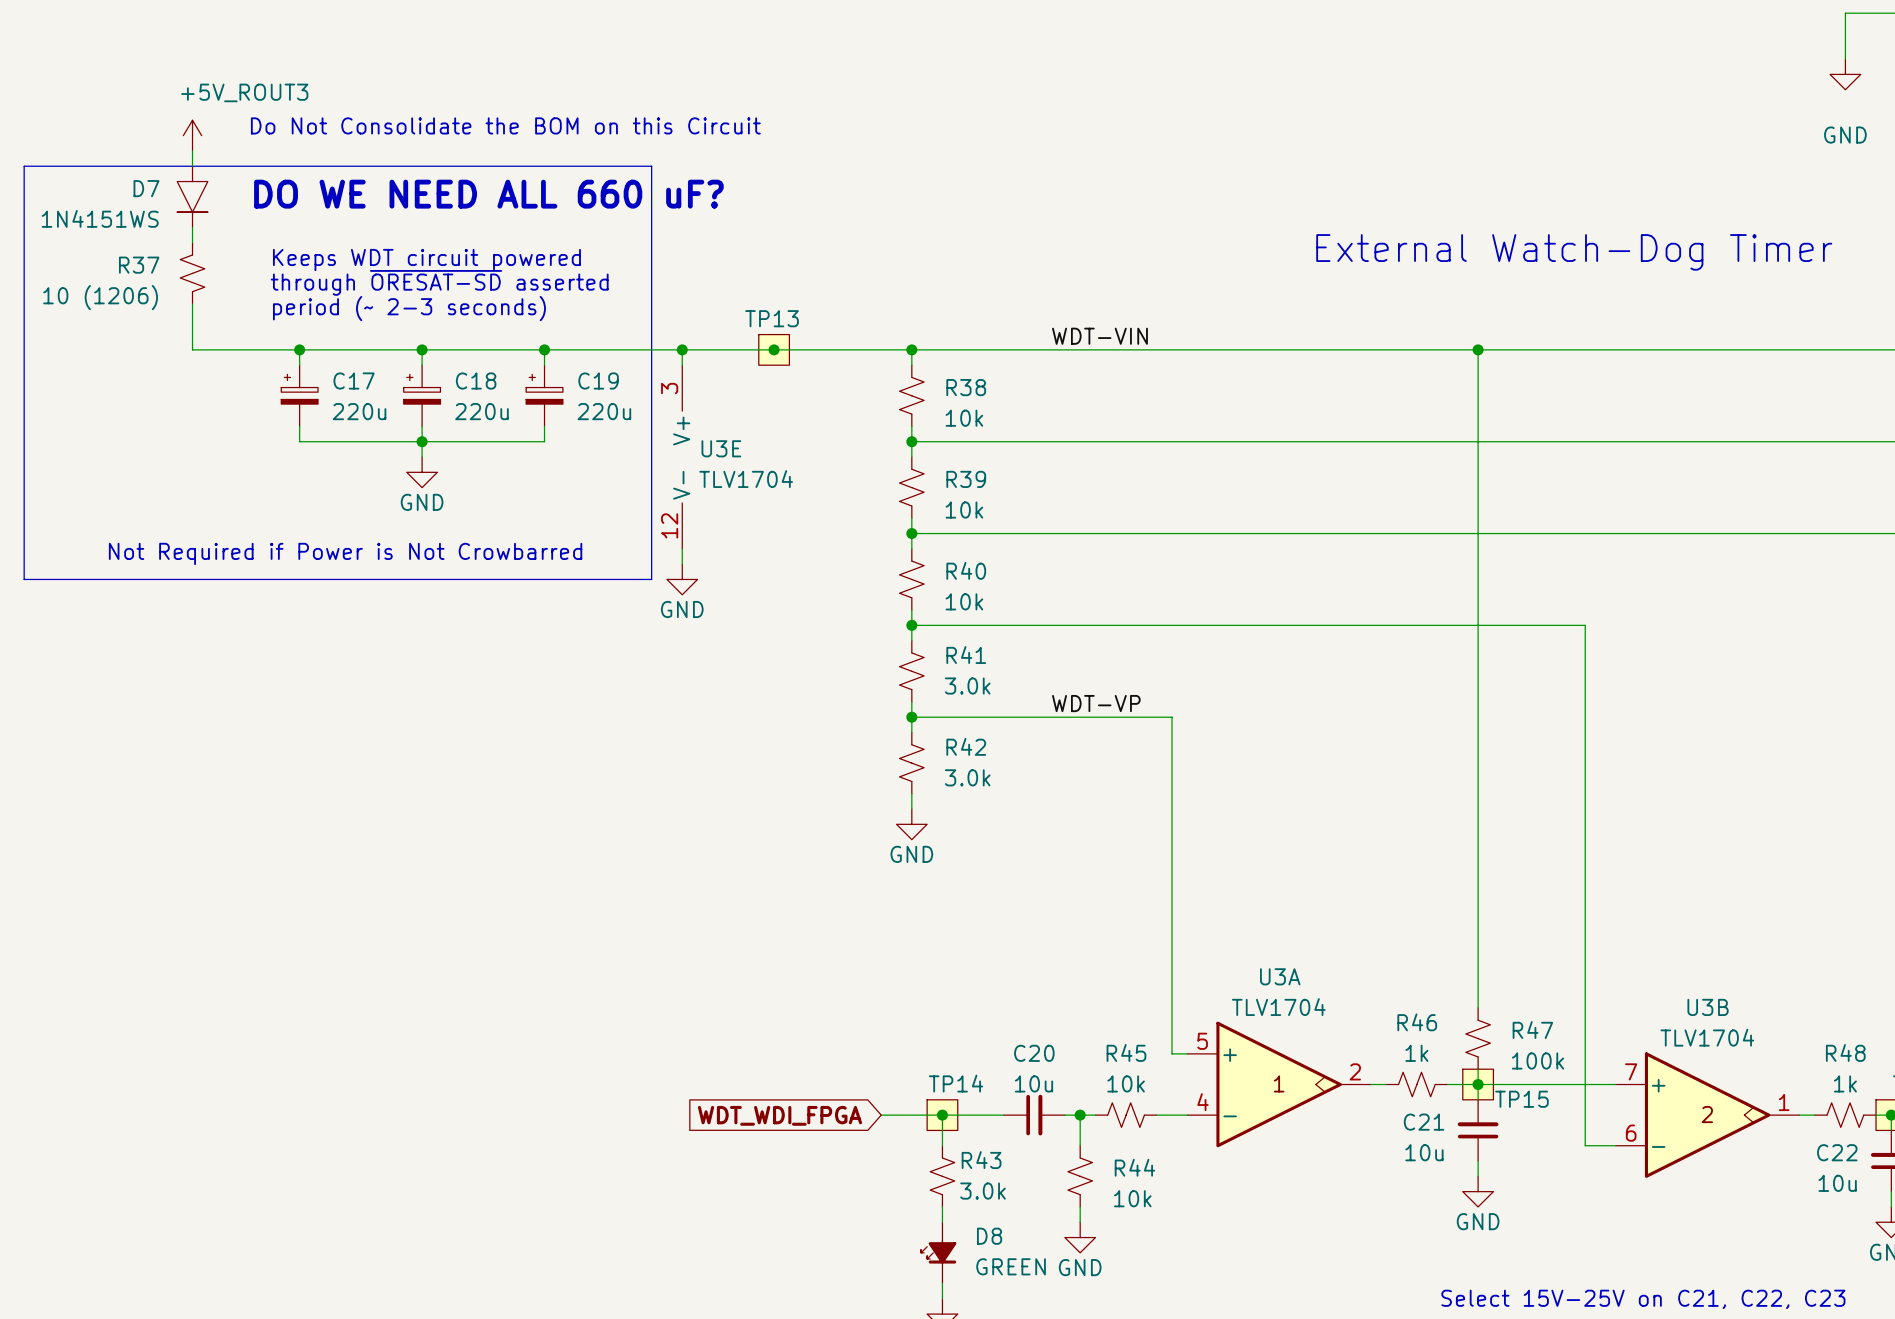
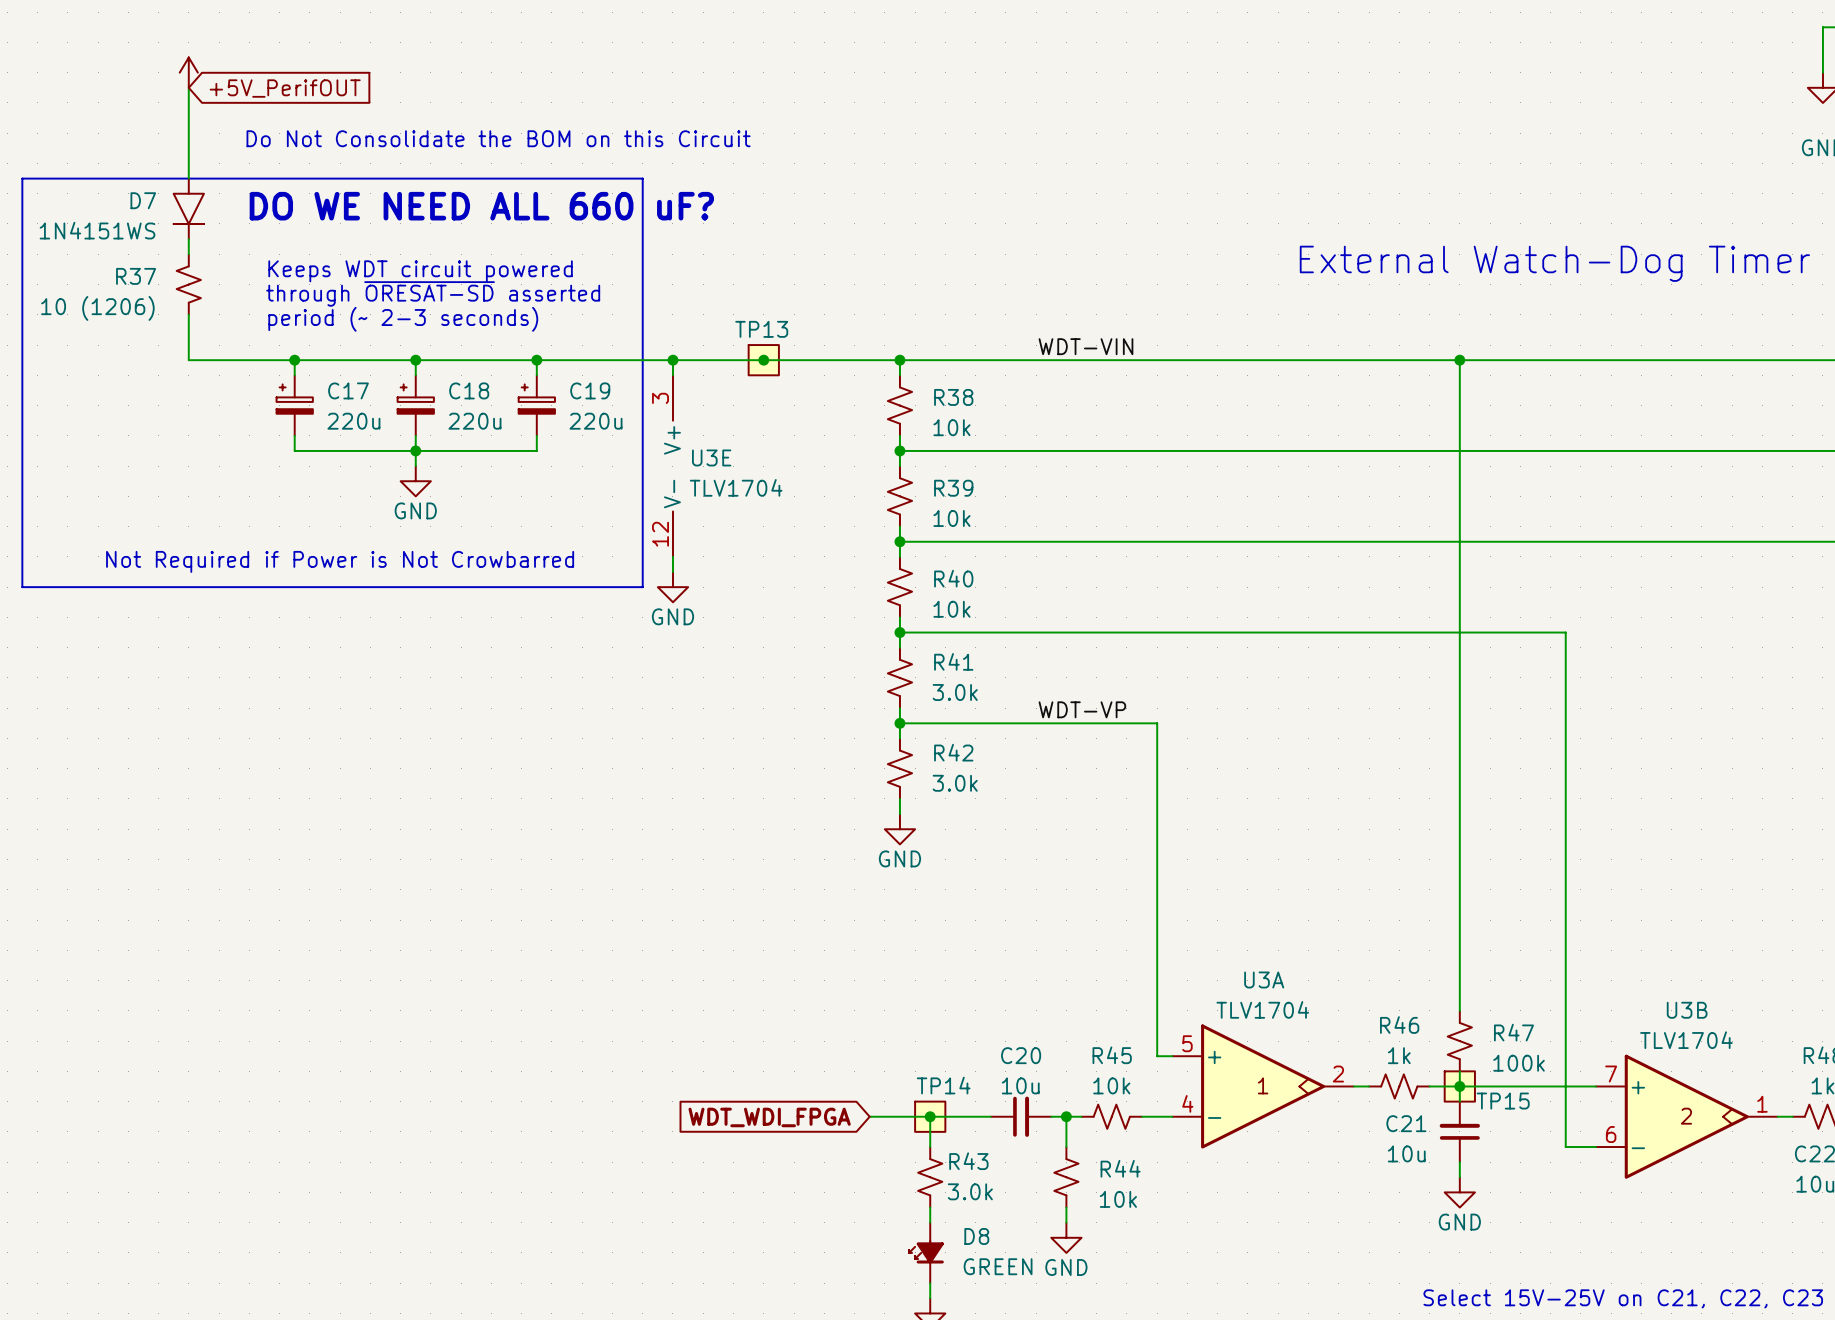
power symbol: none -> (188, 72)
wire: none -> (188, 87) (188, 163)
global label: none -> +5V_PerifOUT (285, 88)
power symbol: +5V_ROUT3 (192, 135) -> none

